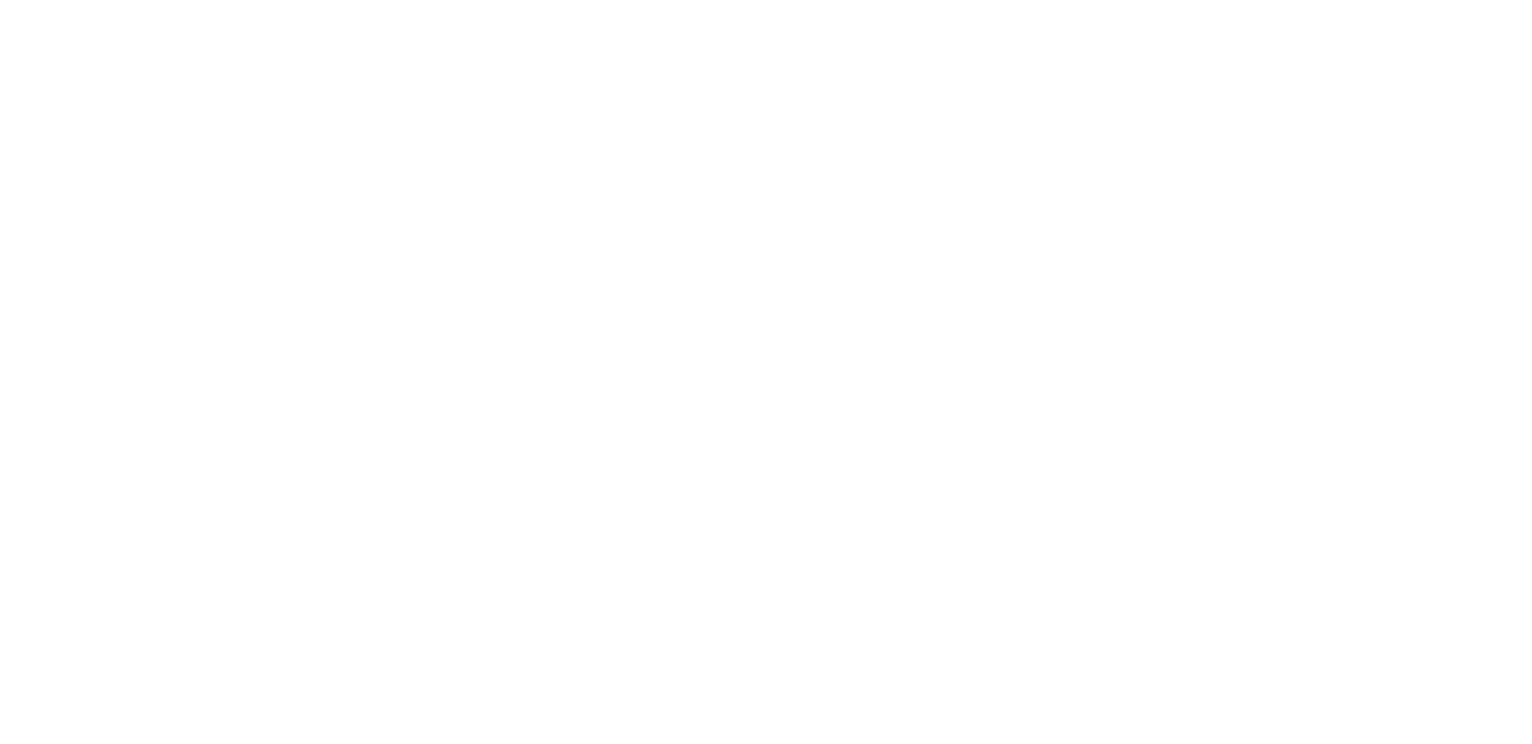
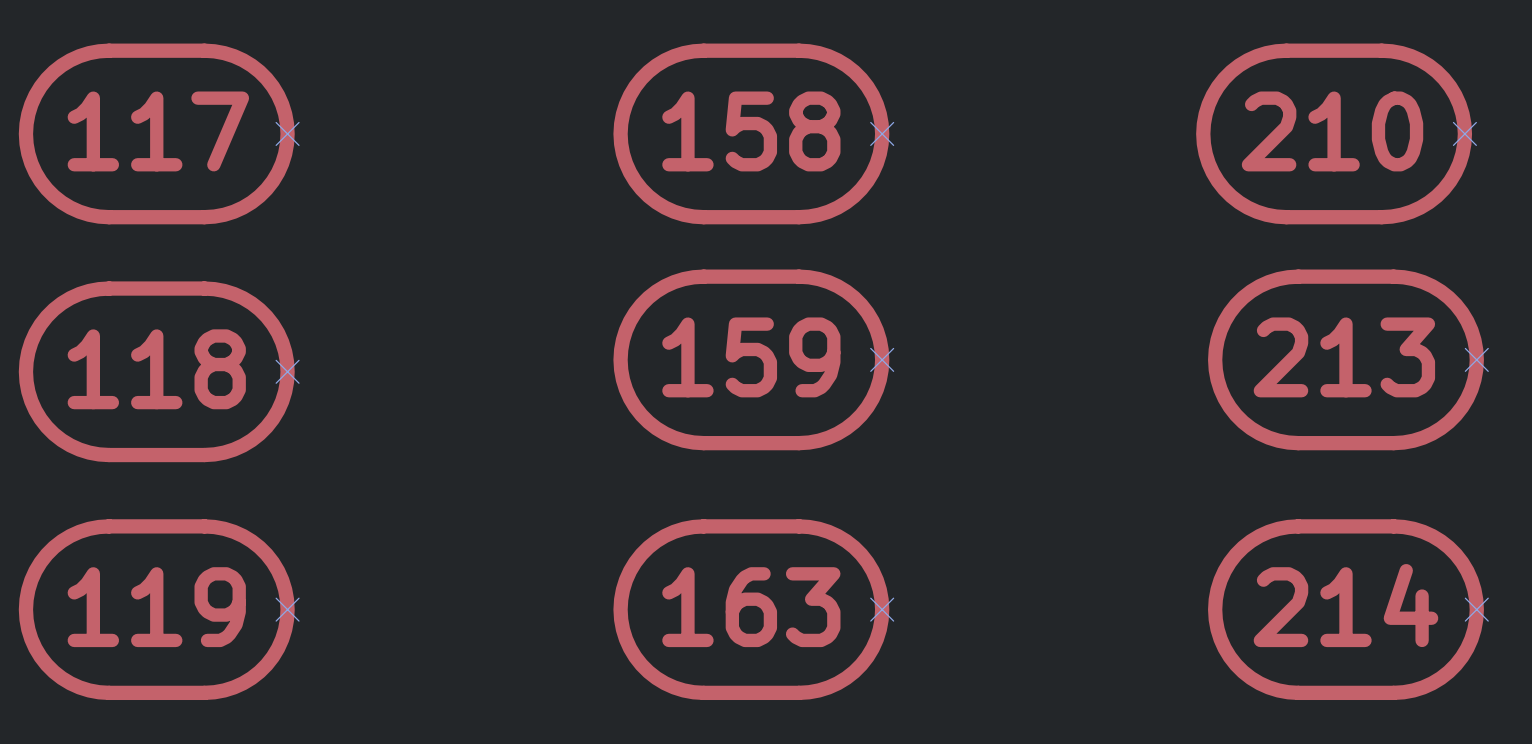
part: none -> (156, 133)
no-connect mark: none -> (287, 133)
part: none -> (751, 133)
no-connect mark: none -> (882, 133)
part: none -> (1334, 133)
no-connect mark: none -> (1464, 133)
part: none -> (751, 359)
no-connect mark: none -> (882, 359)
part: none -> (1345, 359)
no-connect mark: none -> (1476, 359)
part: none -> (156, 371)
no-connect mark: none -> (287, 371)
part: none -> (156, 609)
no-connect mark: none -> (287, 609)
part: none -> (751, 609)
no-connect mark: none -> (882, 609)
part: none -> (1345, 609)
no-connect mark: none -> (1476, 609)

